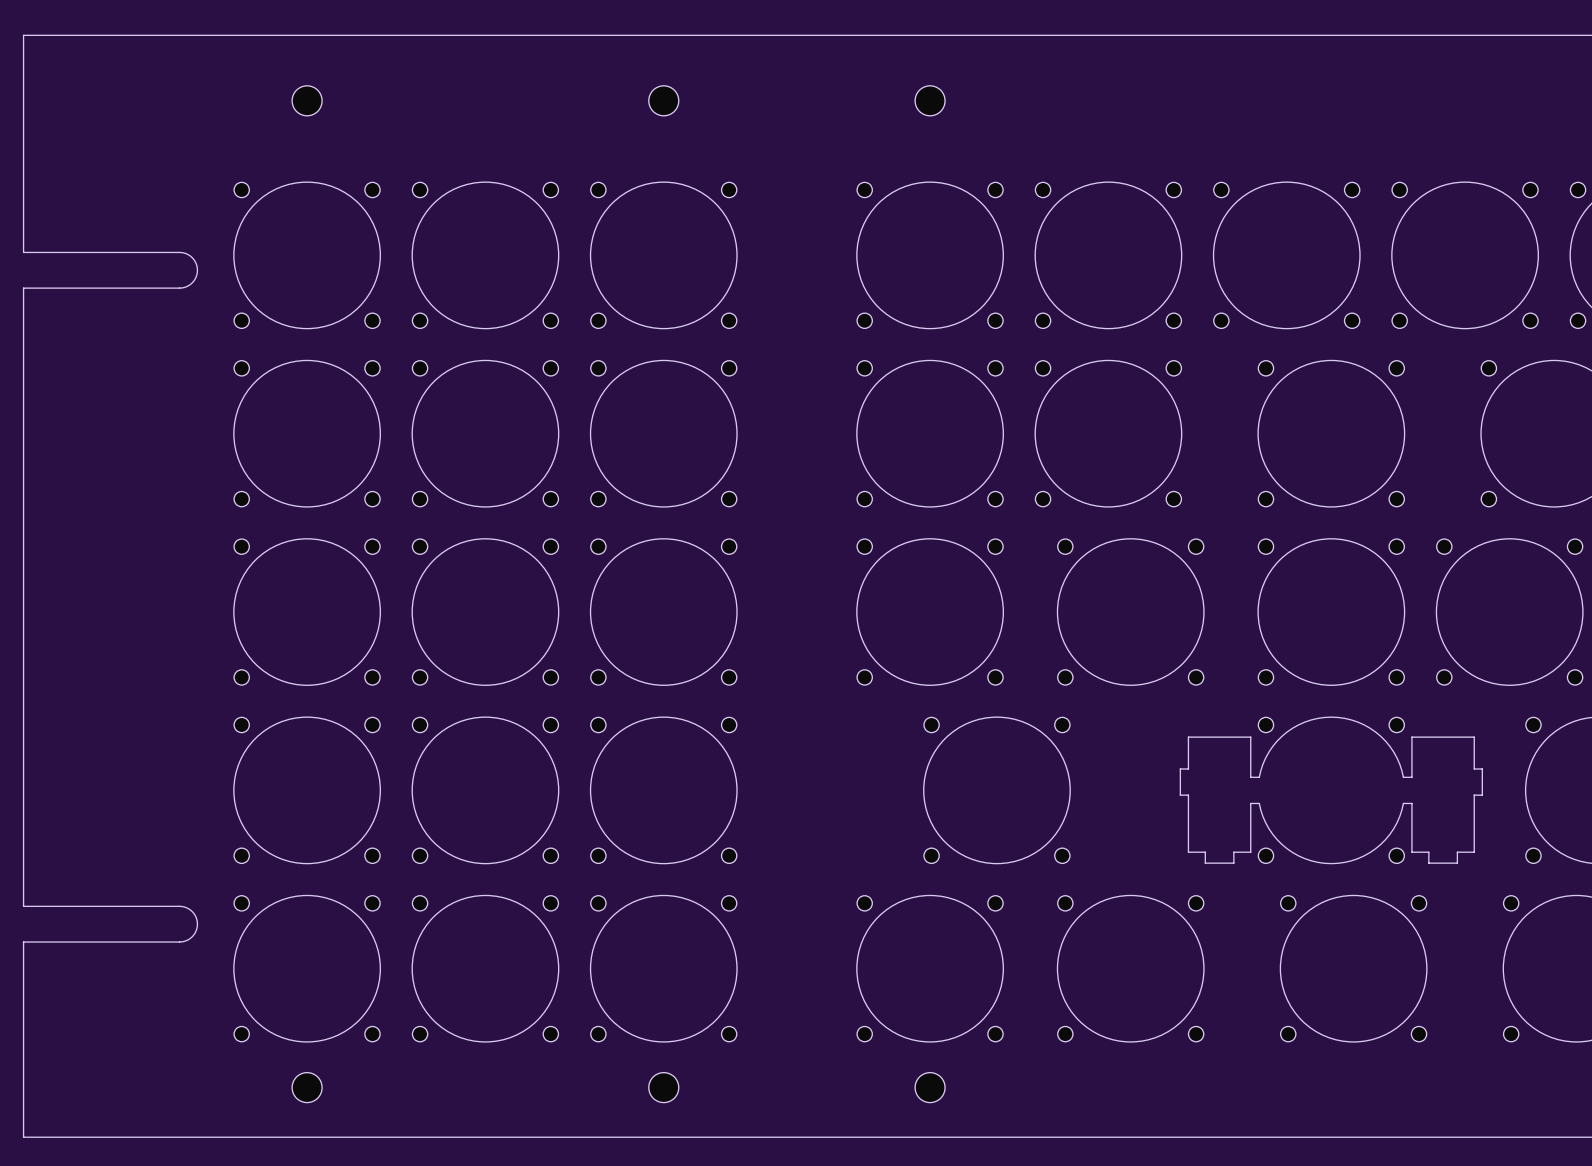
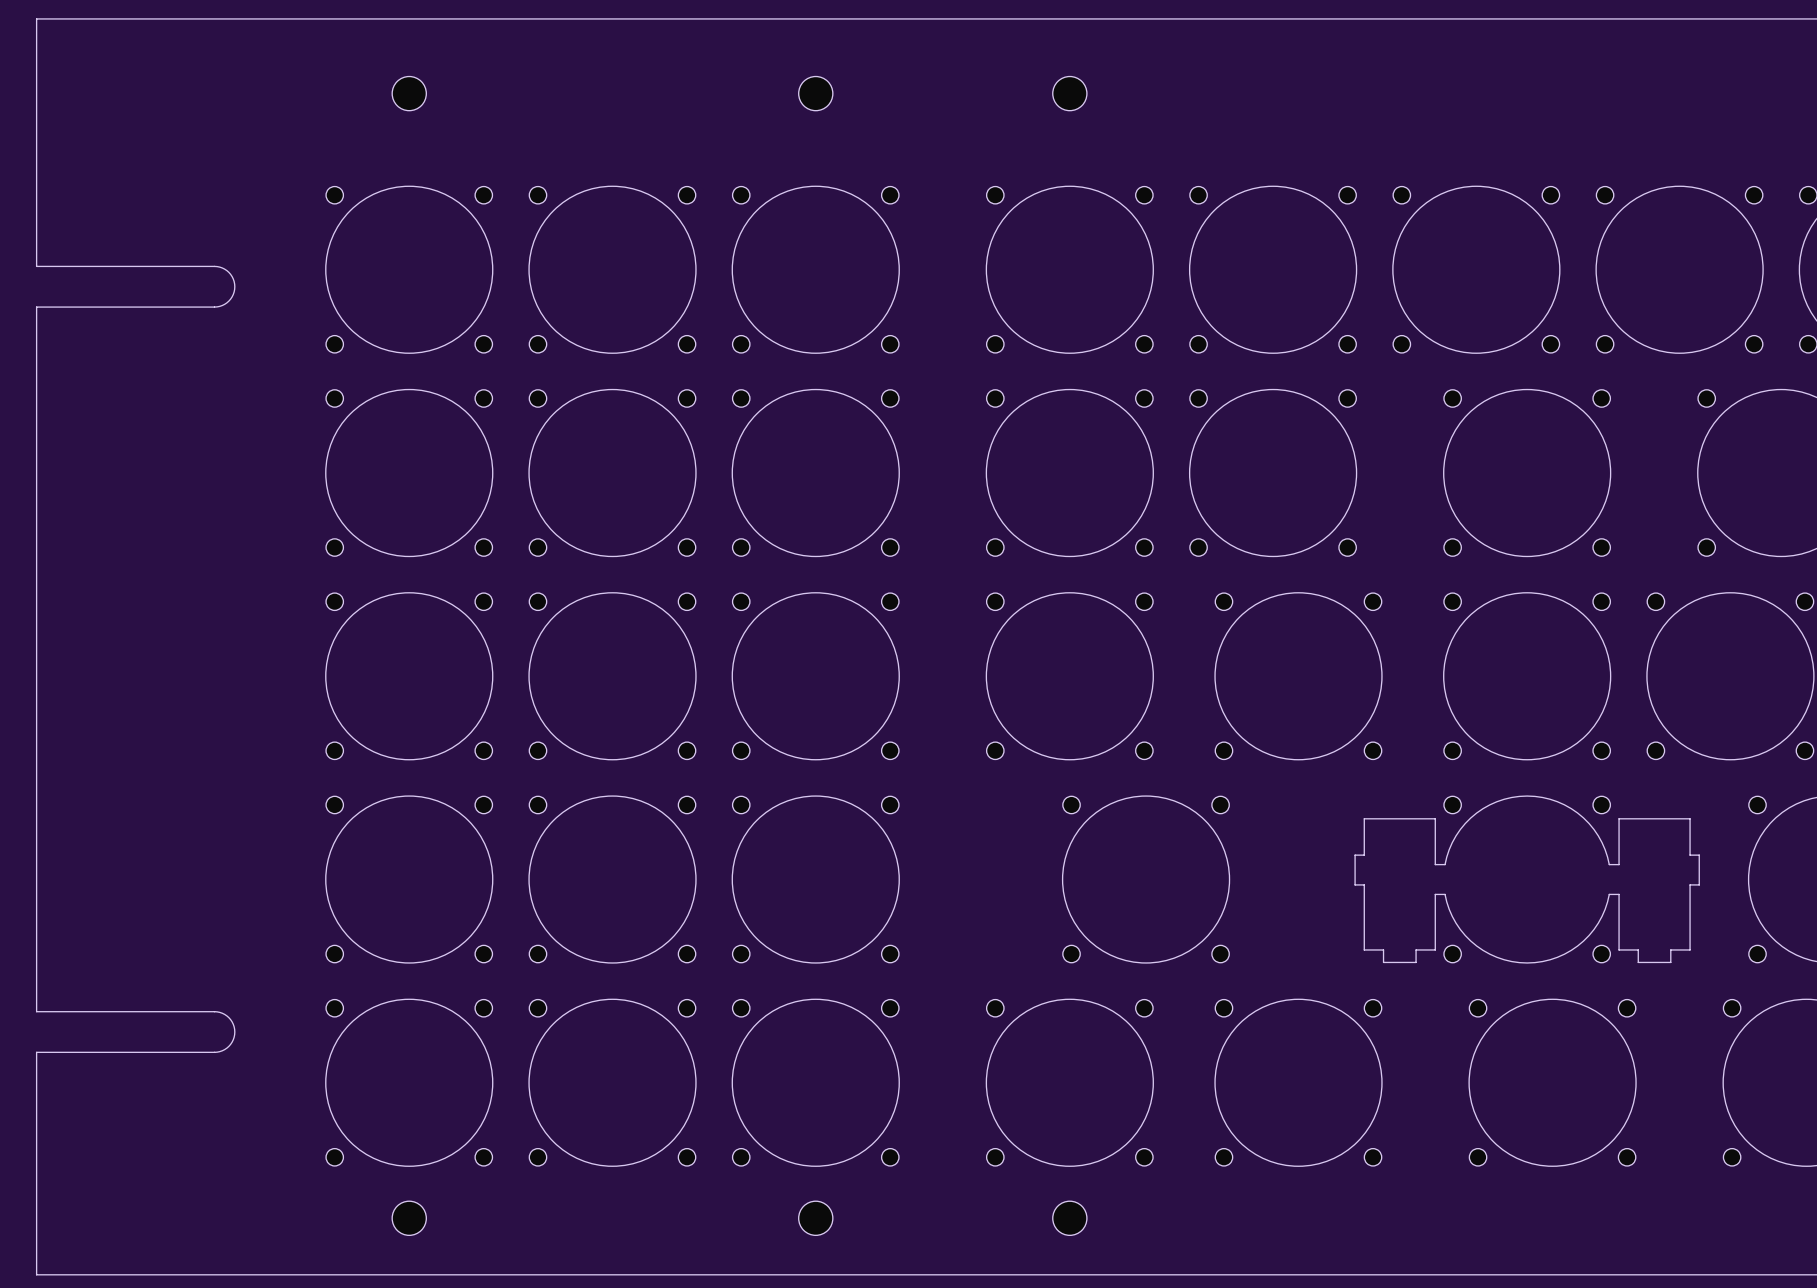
part position: (307, 100) -> (409, 93)
part position: (663, 100) -> (815, 93)
part position: (307, 255) -> (409, 269)
part position: (485, 255) -> (612, 269)
part position: (663, 255) -> (815, 269)
part position: (307, 433) -> (409, 473)
part position: (485, 433) -> (612, 473)
part position: (663, 433) -> (815, 473)
part position: (307, 612) -> (409, 676)
part position: (485, 612) -> (612, 676)
part position: (663, 612) -> (815, 676)
part position: (307, 790) -> (409, 879)
part position: (485, 790) -> (612, 879)
part position: (663, 790) -> (815, 879)
part position: (307, 968) -> (409, 1082)
part position: (485, 968) -> (612, 1082)
part position: (663, 968) -> (815, 1082)
part position: (307, 1087) -> (409, 1218)
part position: (663, 1087) -> (815, 1218)

